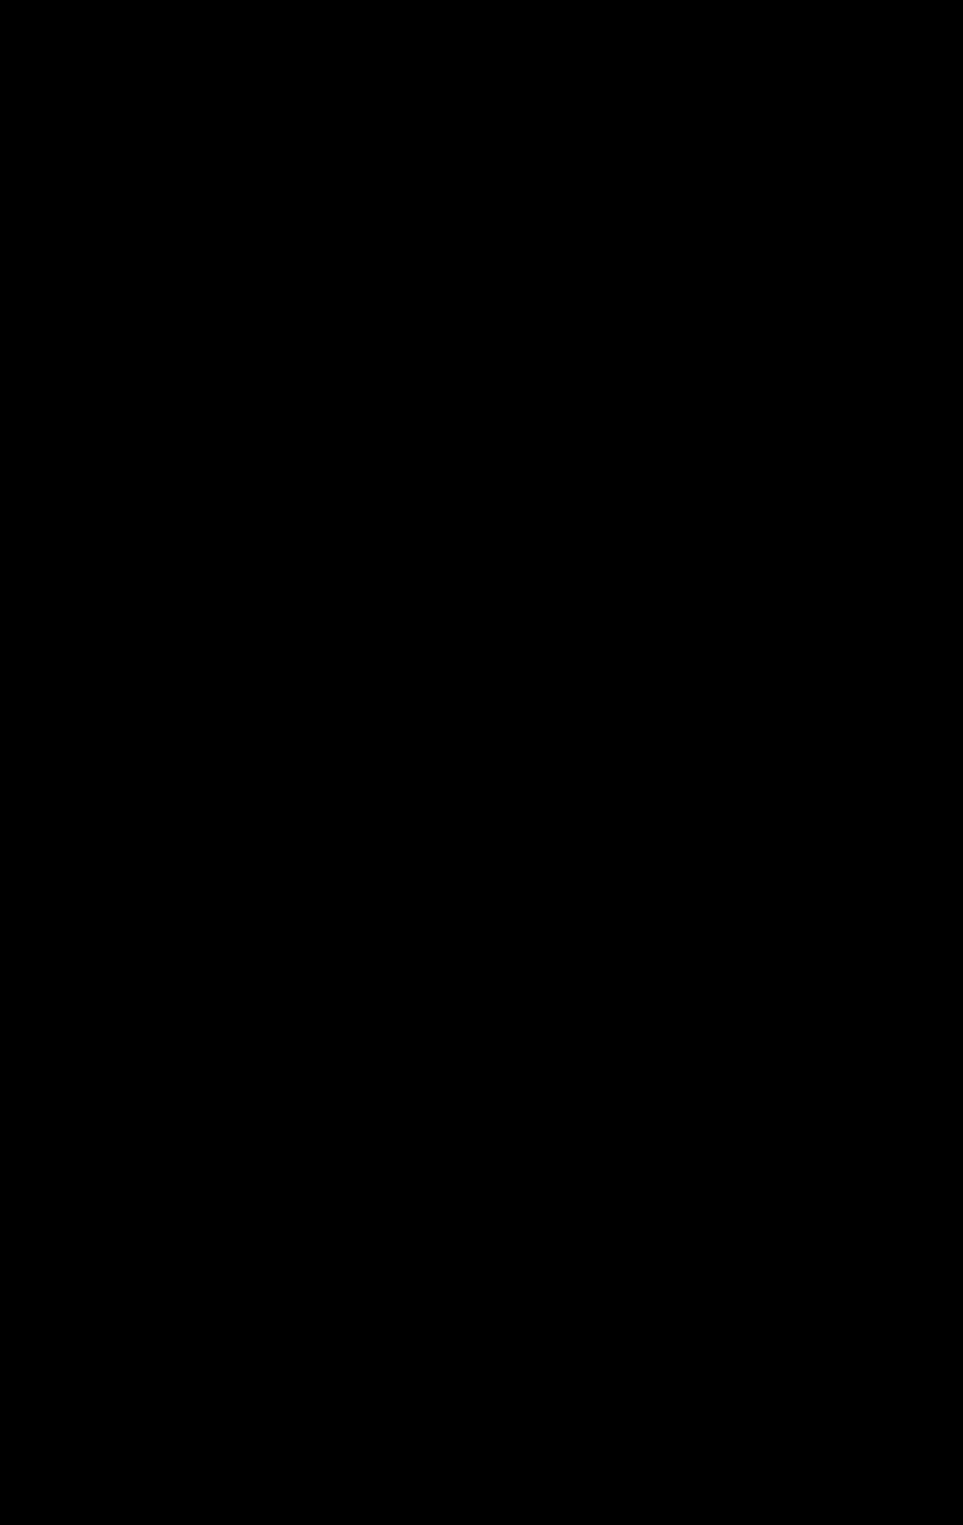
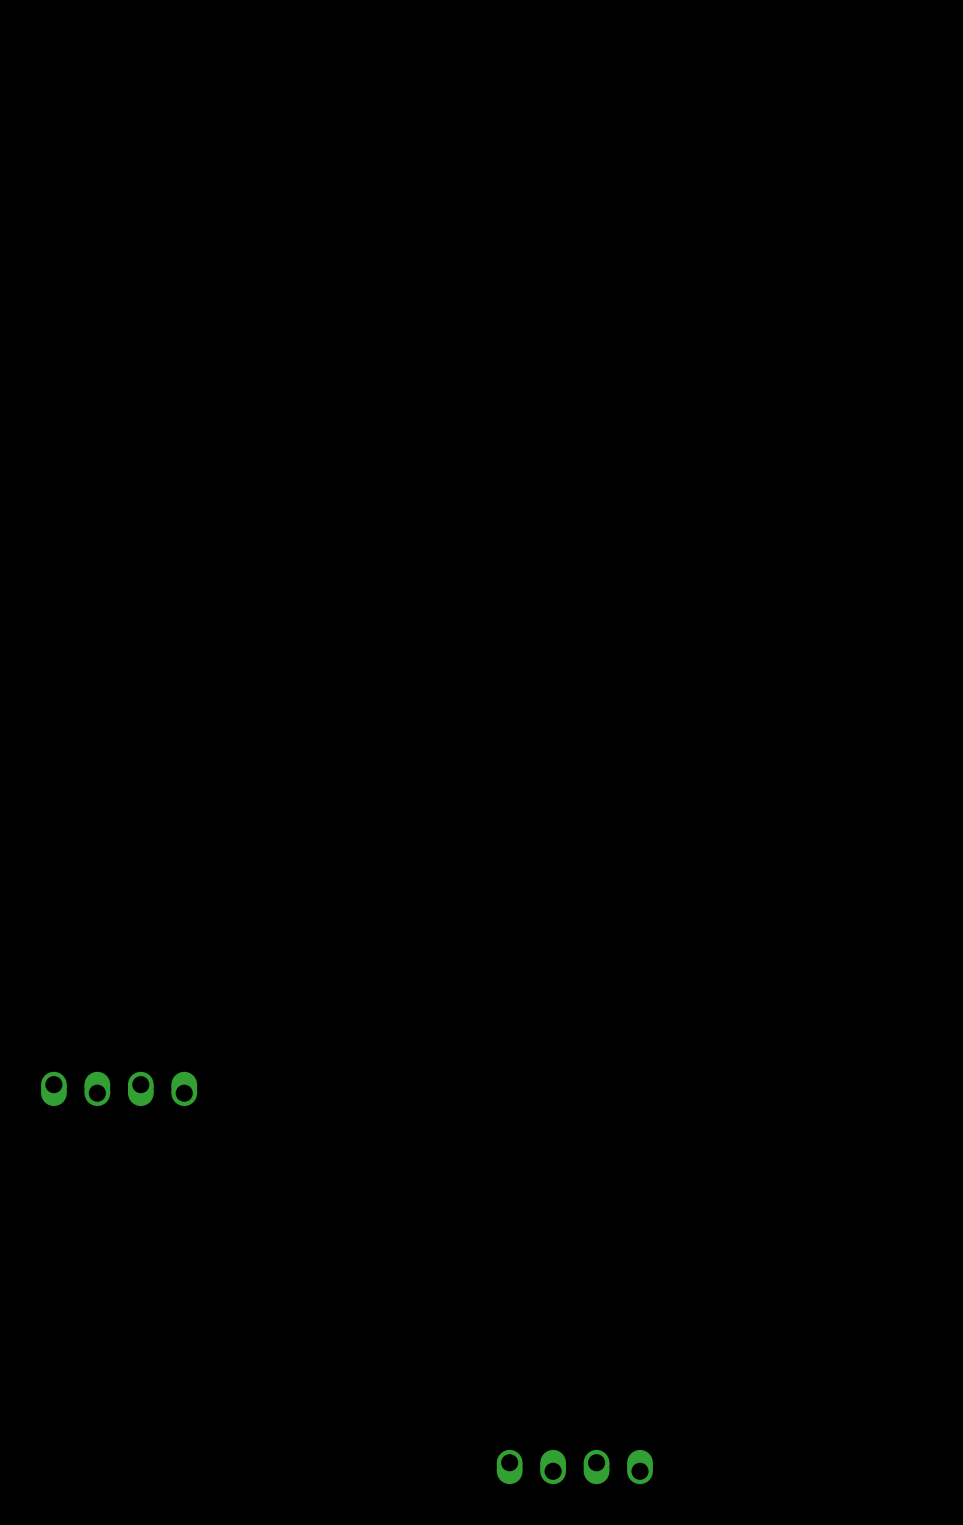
part: none -> (119, 1088)
part: none -> (574, 1467)

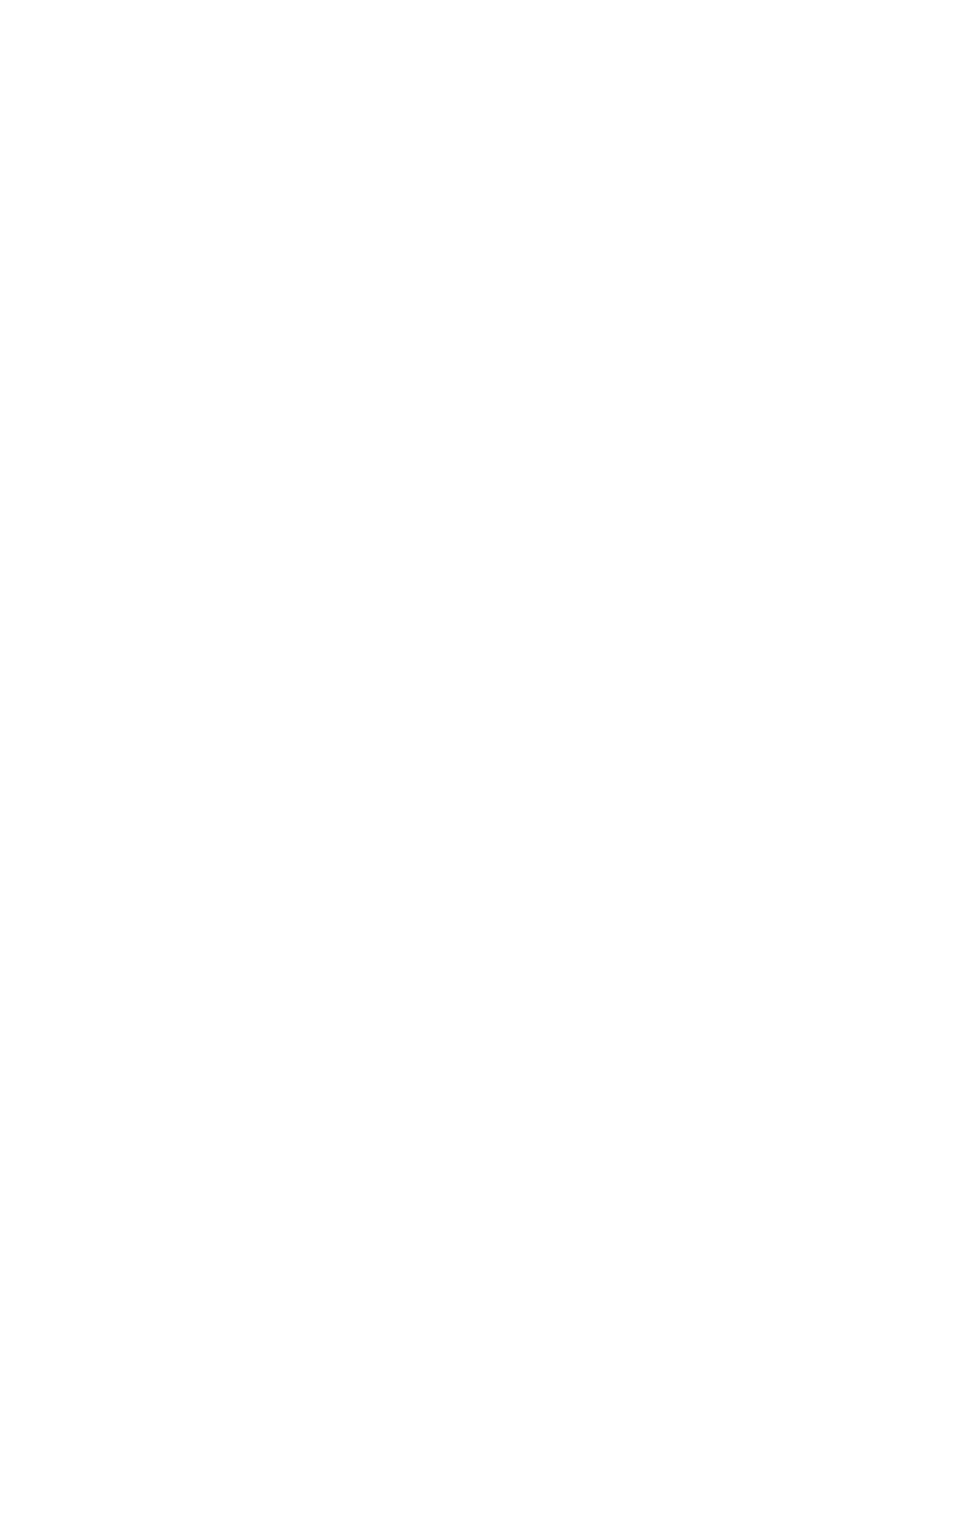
part: (119, 1088) -> none
part: (574, 1467) -> none

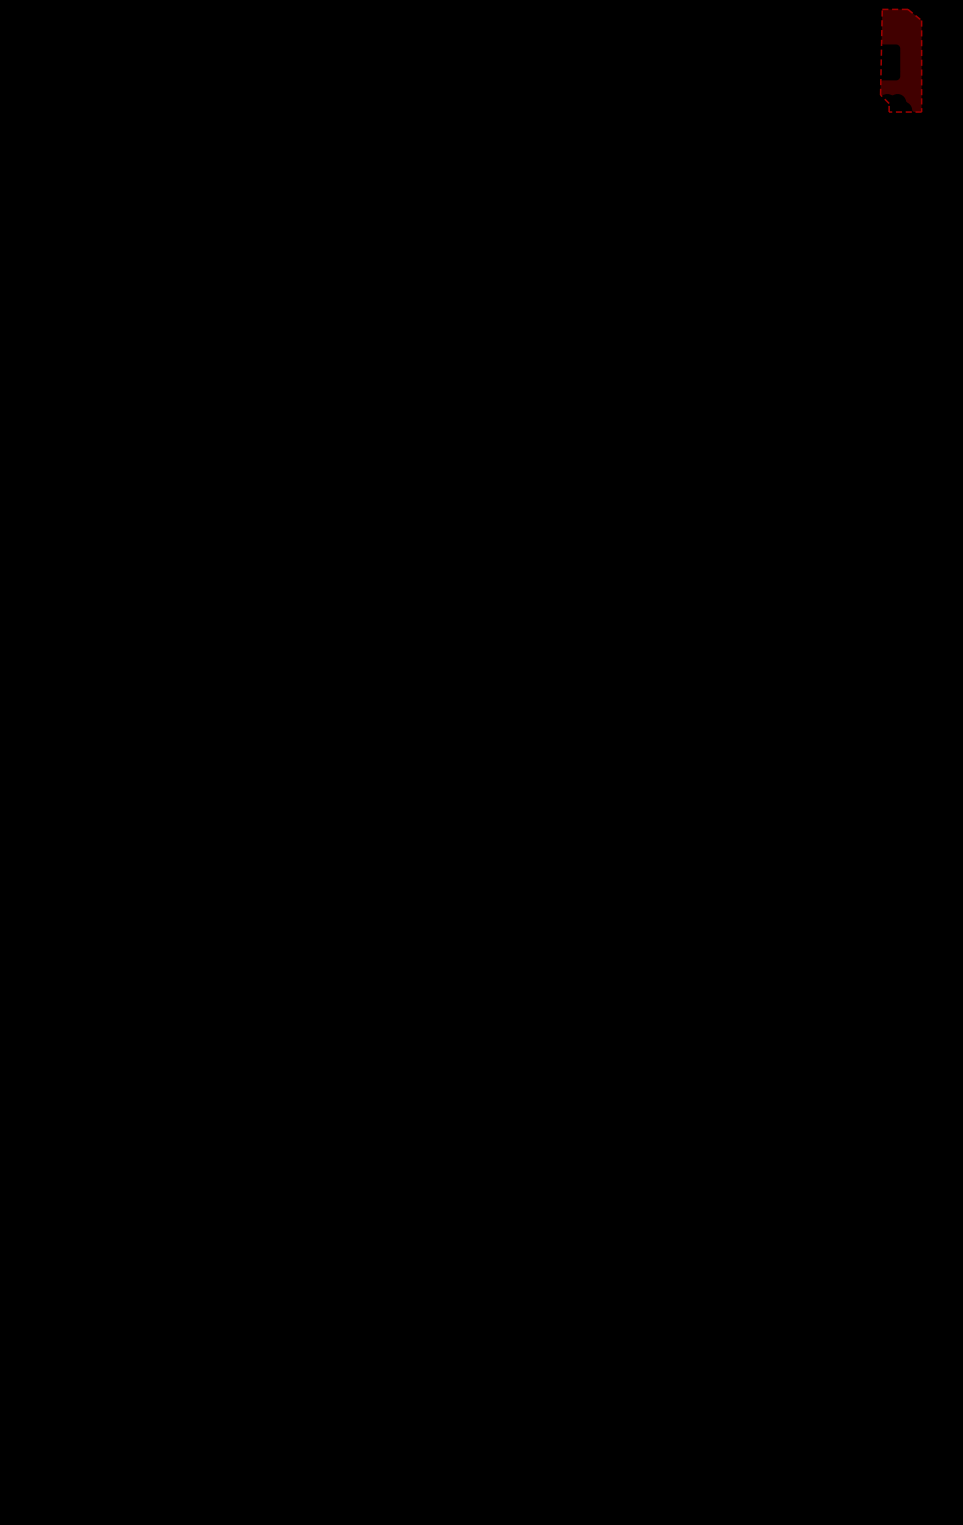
zone outline: none -> (882, 9) (880, 94) (889, 103) (889, 112) (921, 112) (921, 20) (907, 9) (882, 9)

